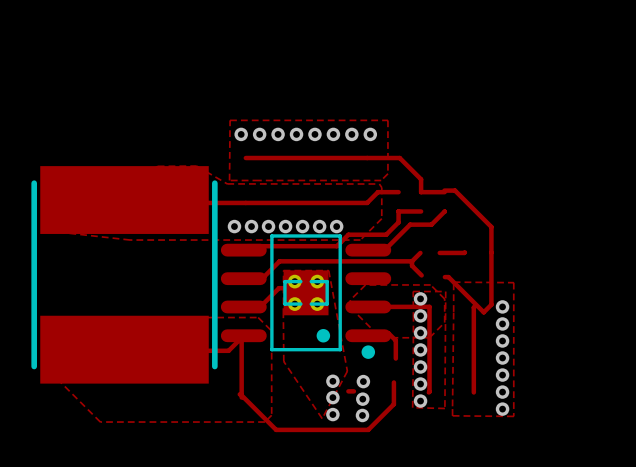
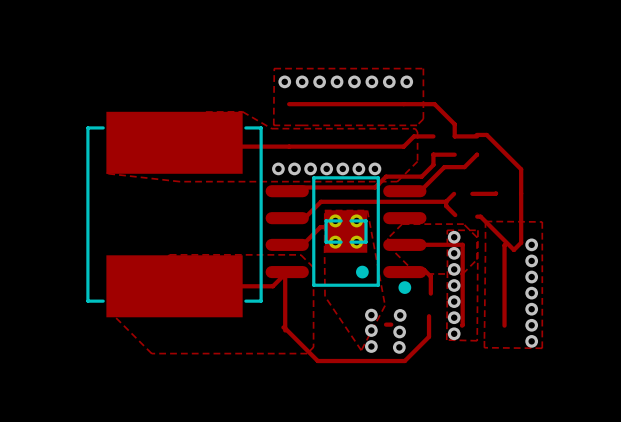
part footprint: [31, 166, 218, 384] -> [86, 111, 263, 318]

